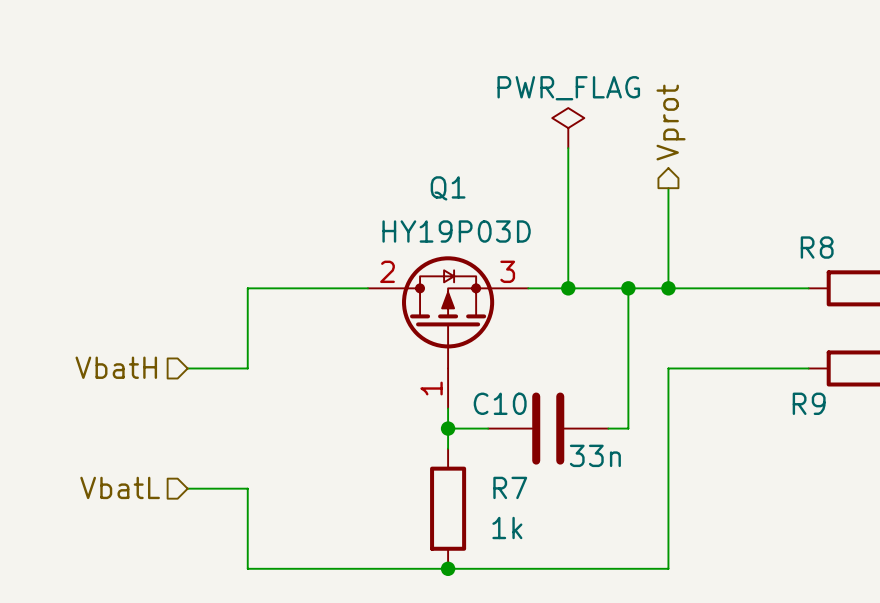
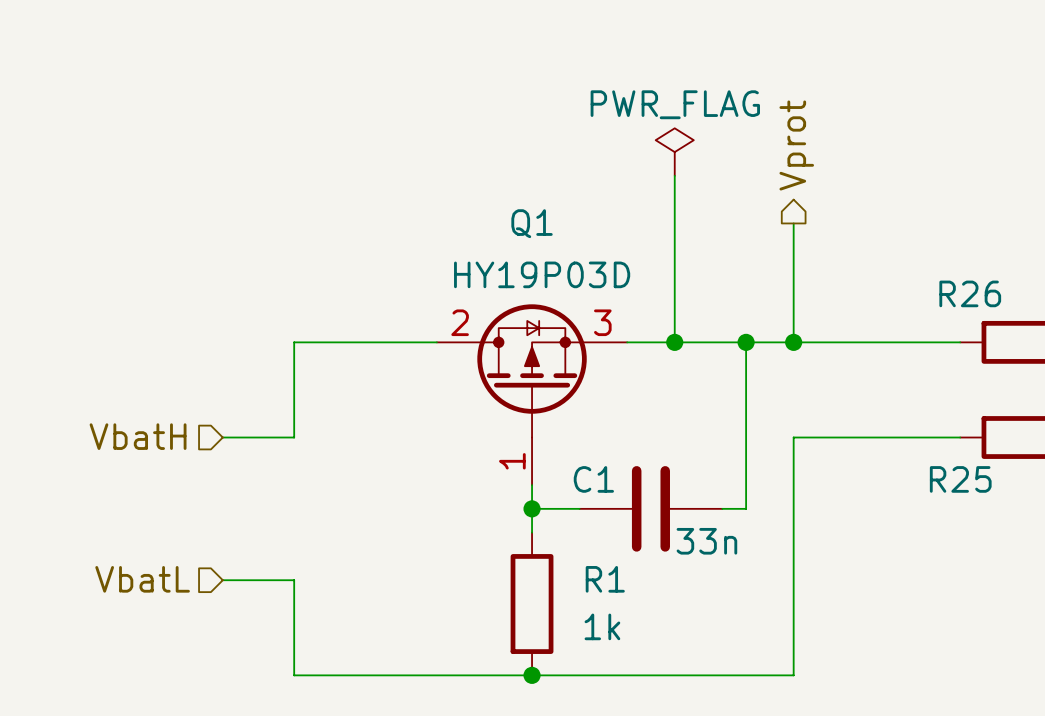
R8 name: R8 (817, 247) -> R26 (970, 293)
C10 name: C10 (500, 403) -> C1 (593, 479)
R9 name: R9 (809, 403) -> R25 (960, 479)
R7 name: R7 (510, 487) -> R1 (605, 579)

